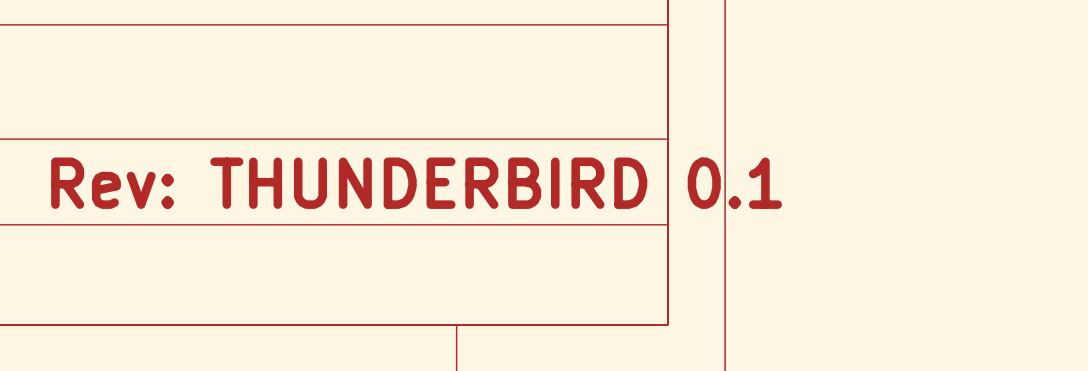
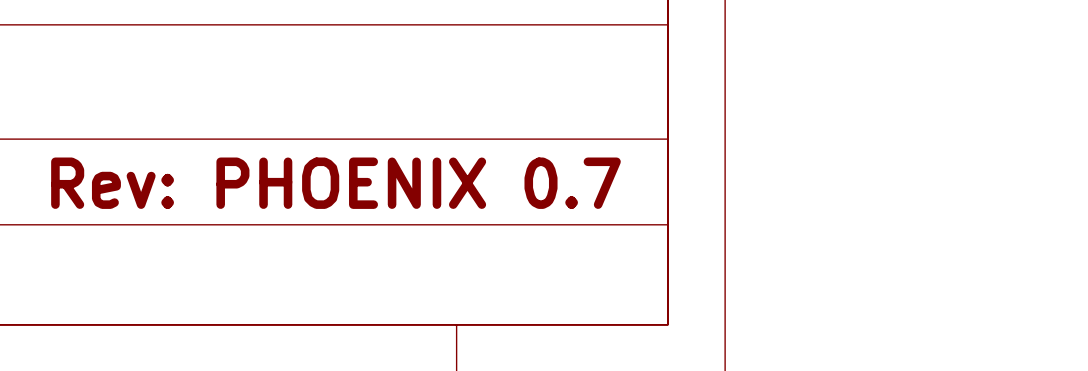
title block: Rev: THUNDERBIRD 0.1 (416, 183) -> Rev: PHOENIX 0.7 (335, 183)

